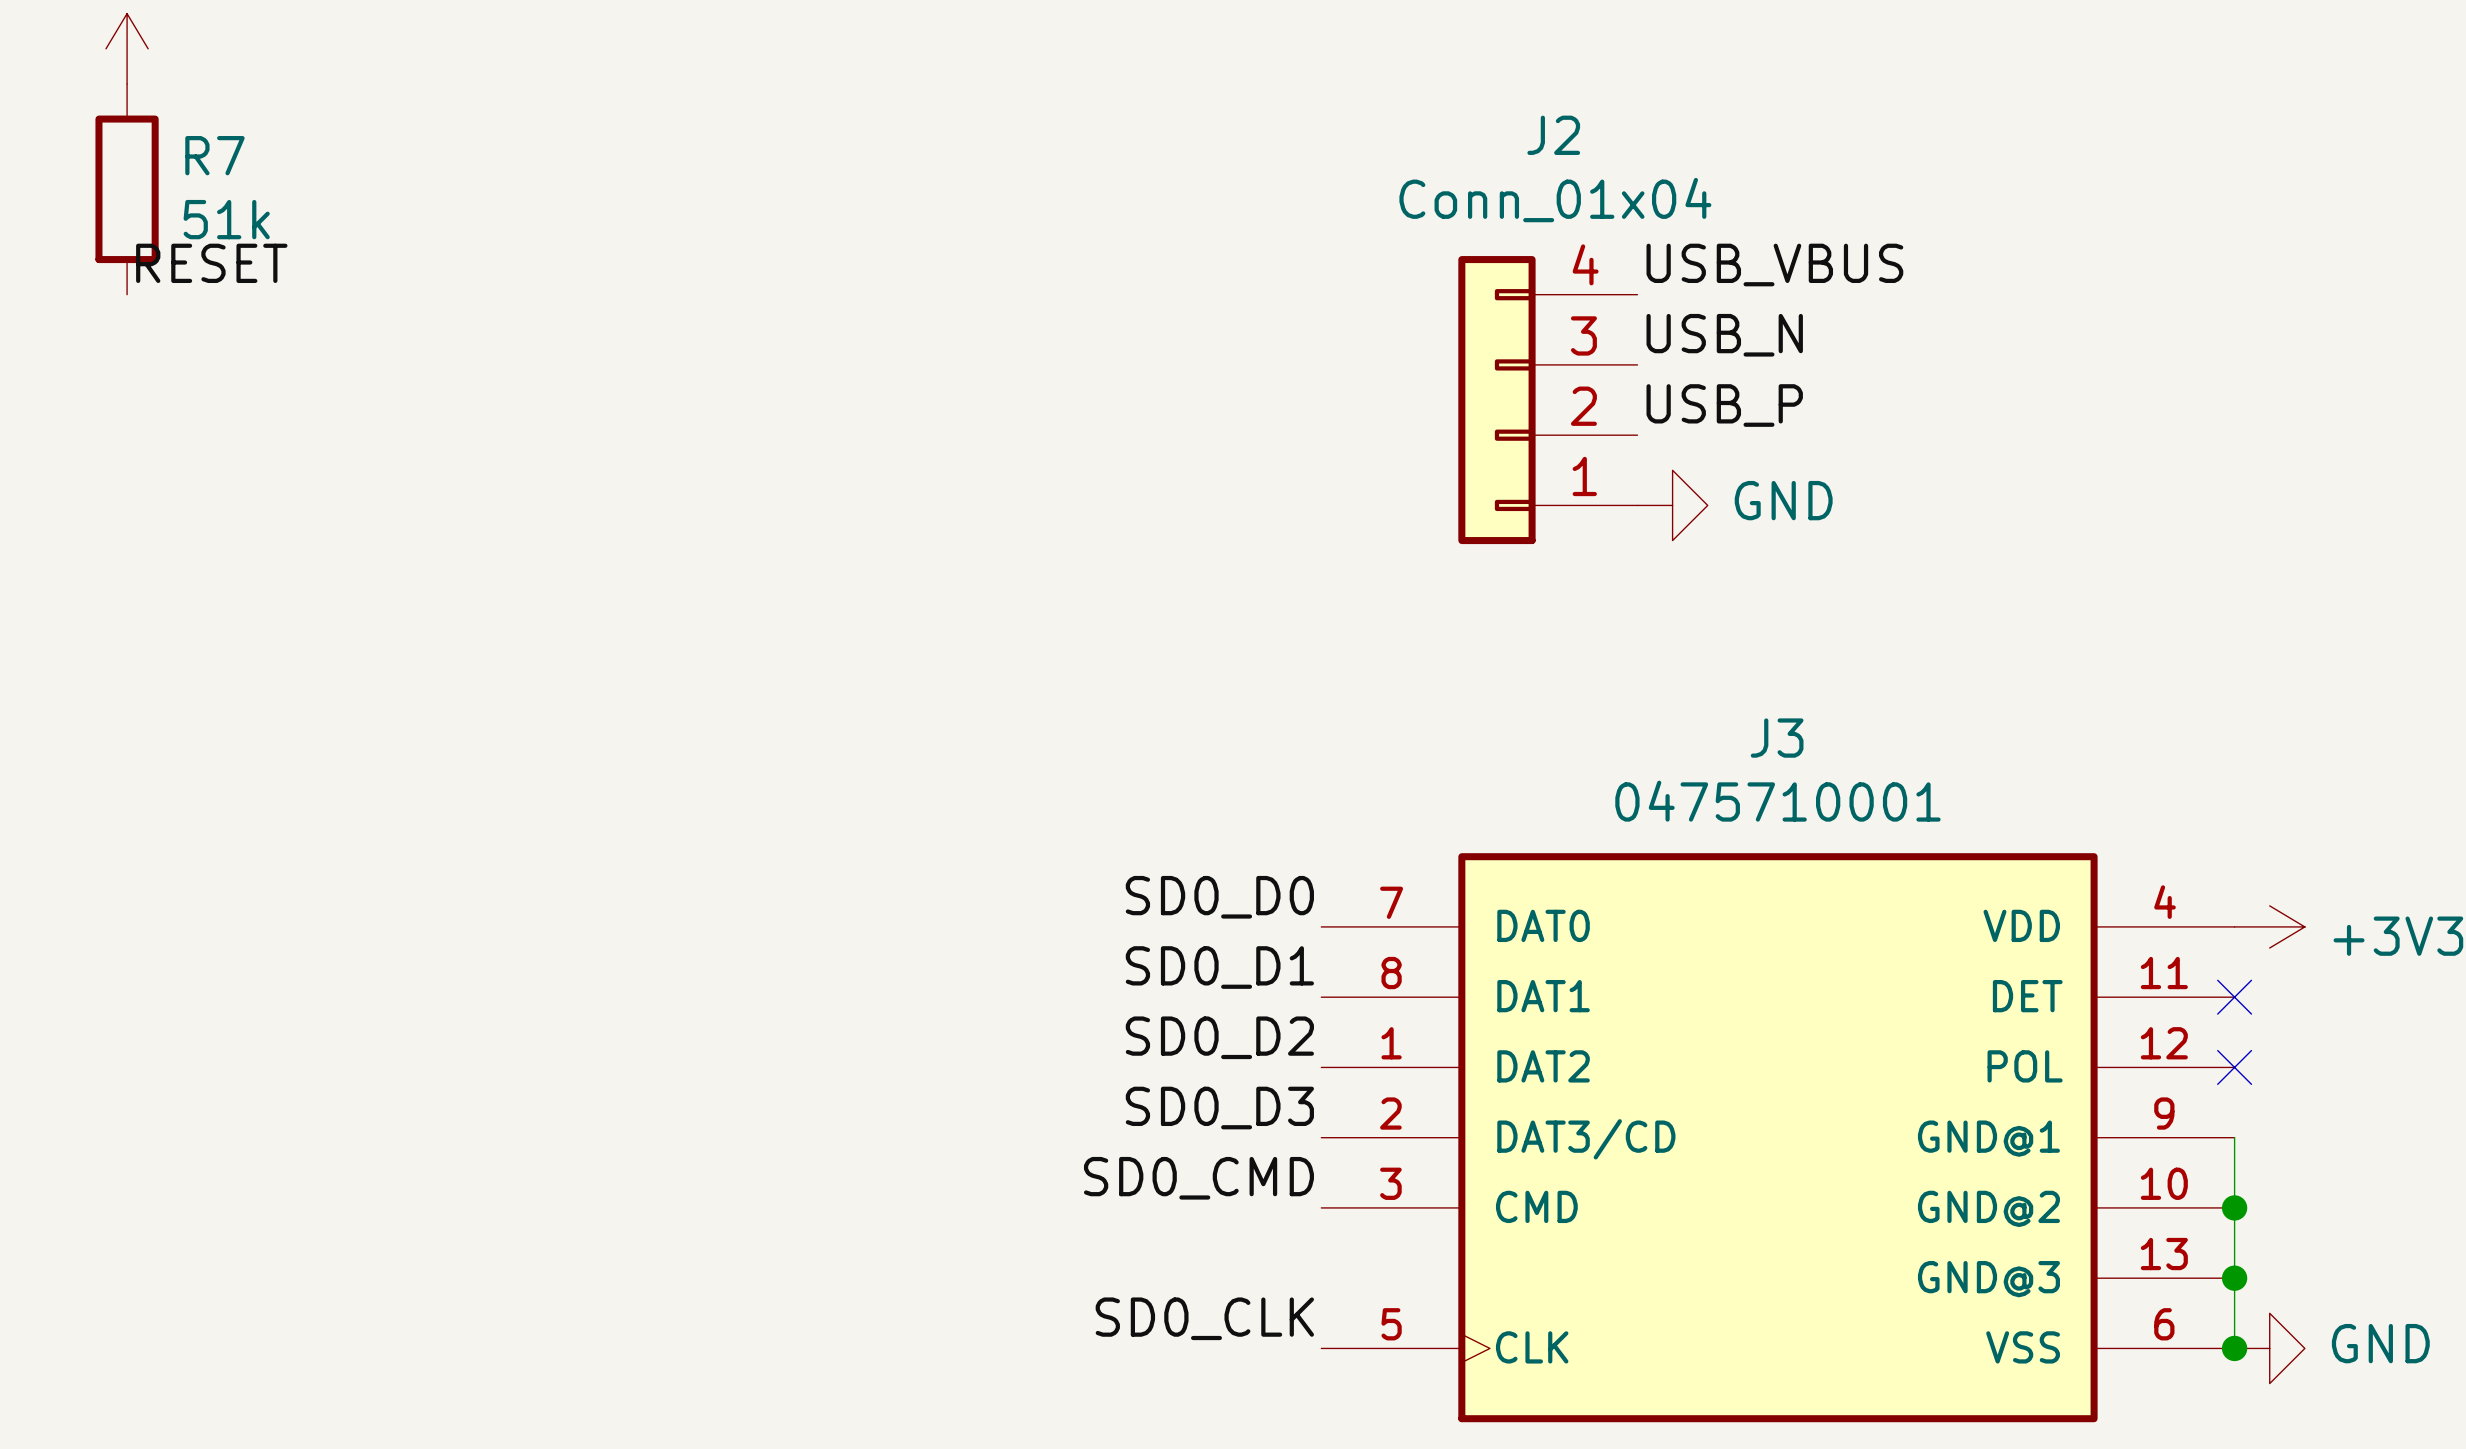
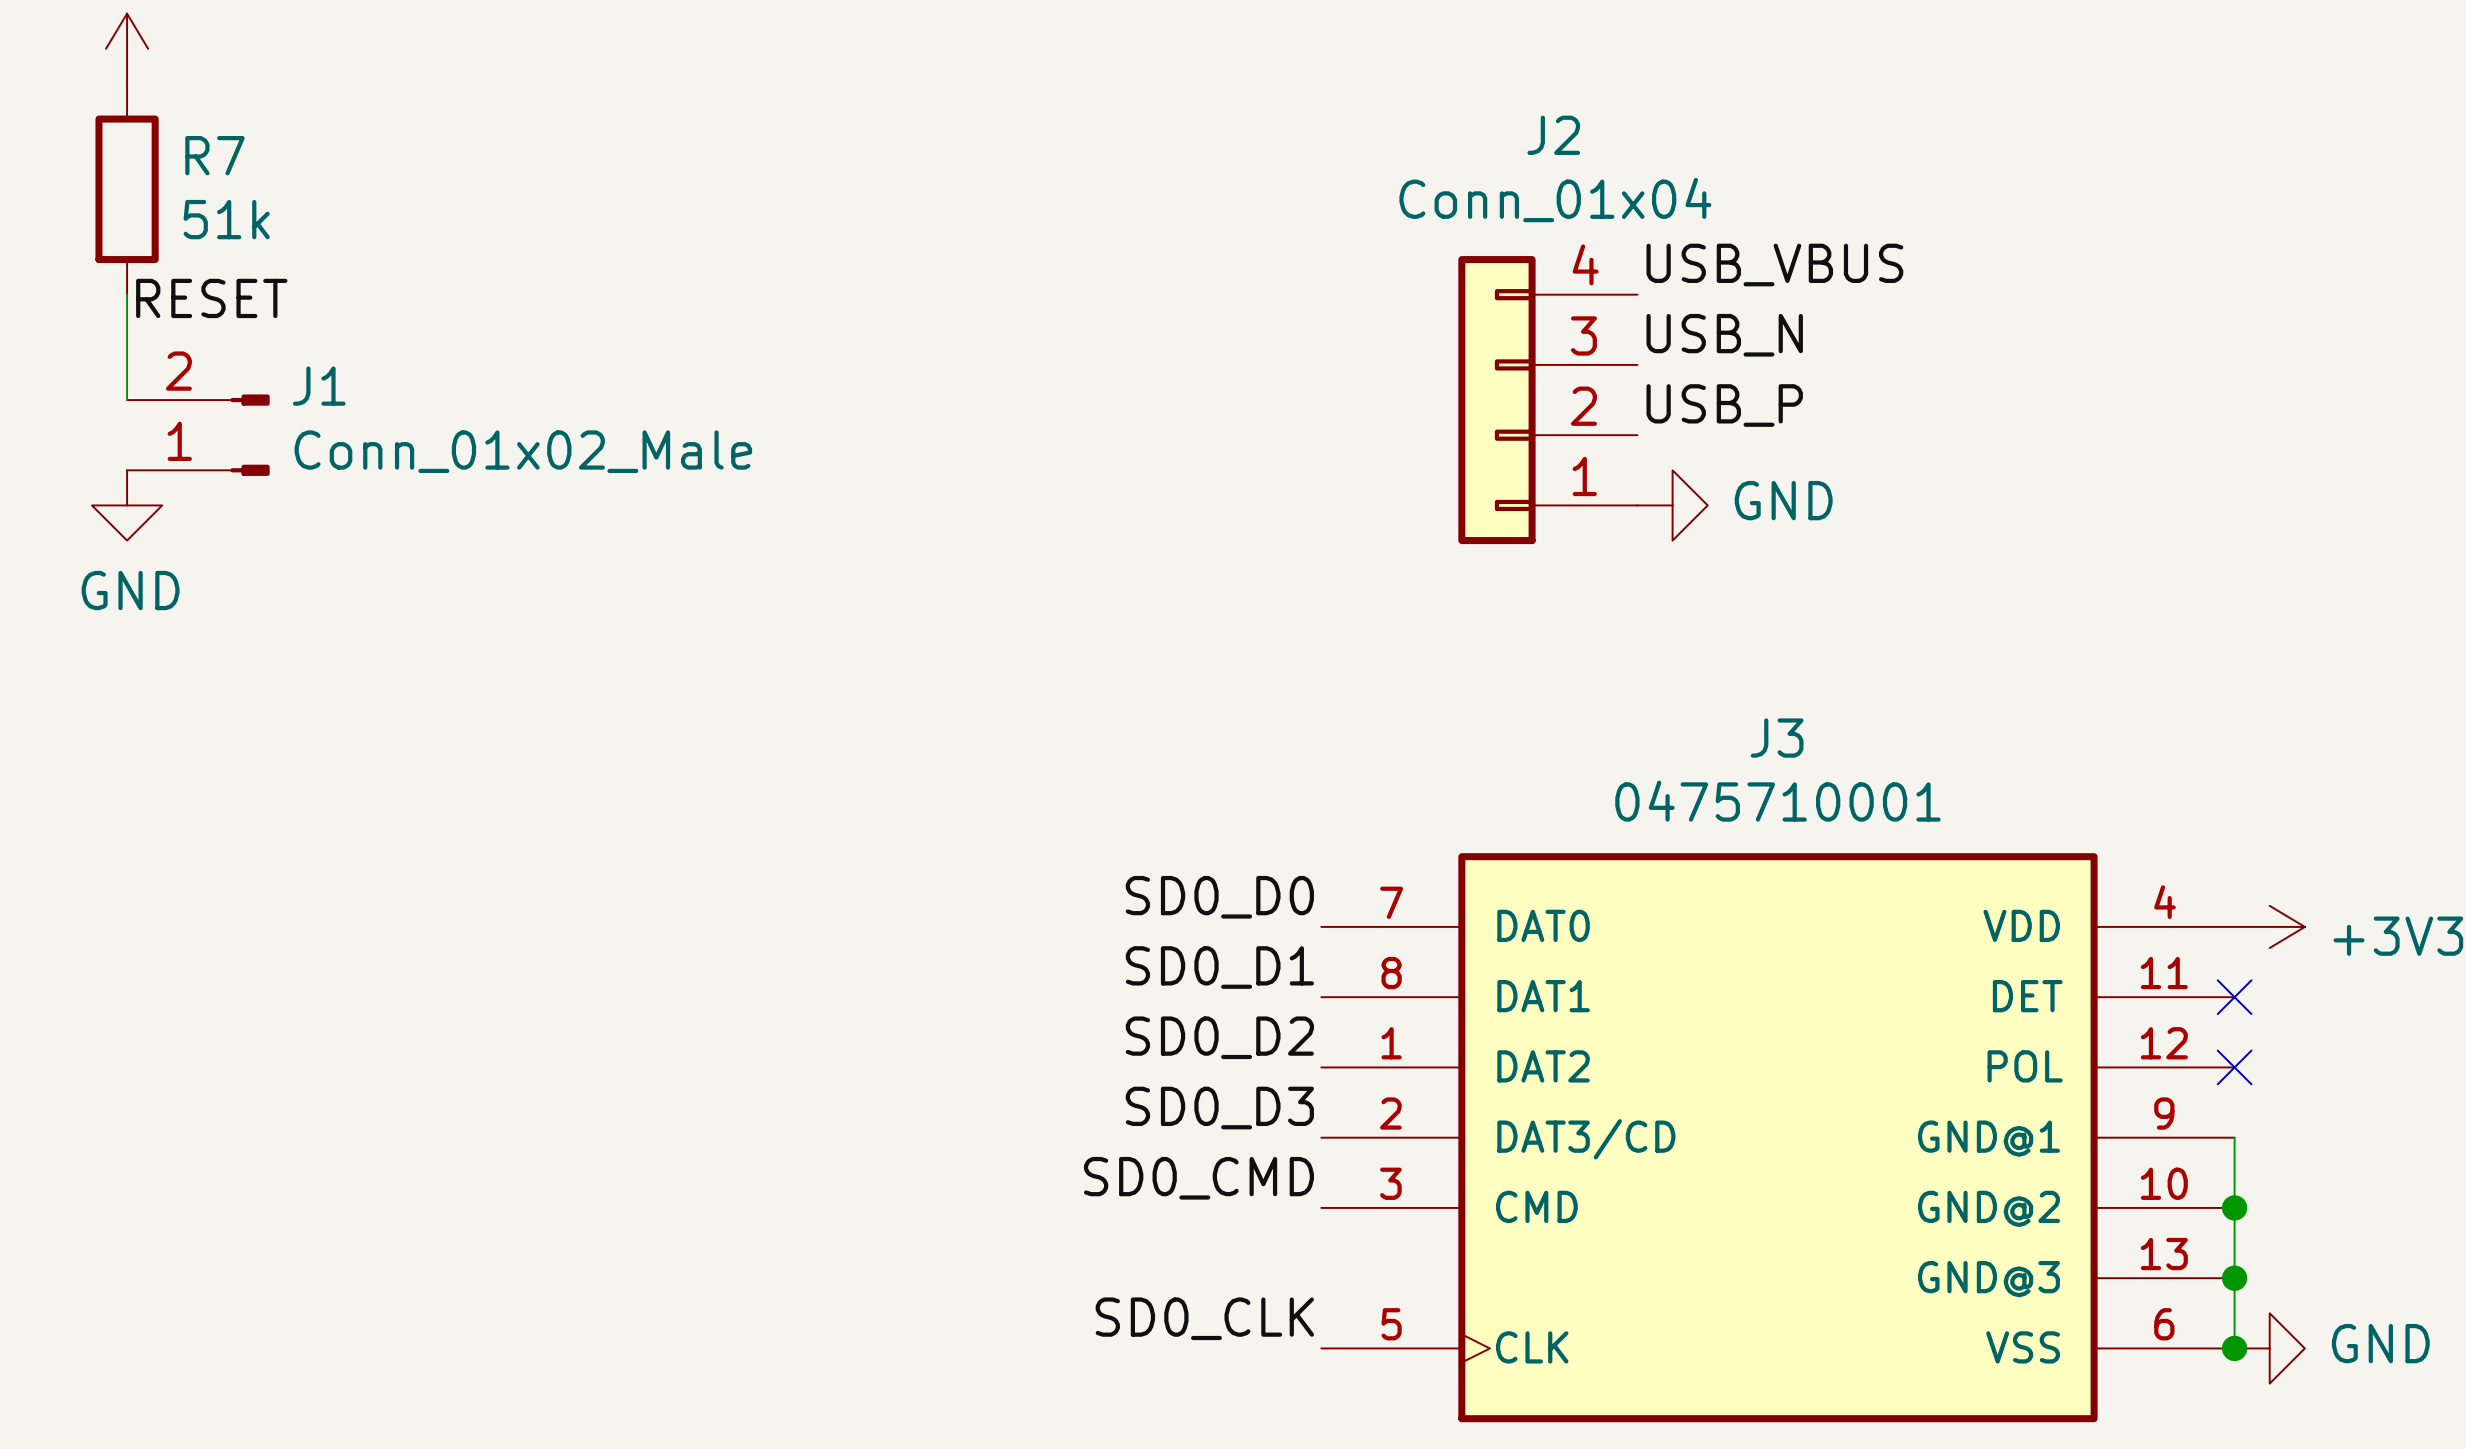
label position: RESET (211, 263) -> RESET (211, 298)
wire: none -> (127, 294) (127, 400)
J1: none -> Conn_01x02_Male (198, 435)
power symbol: none -> GND (127, 505)

